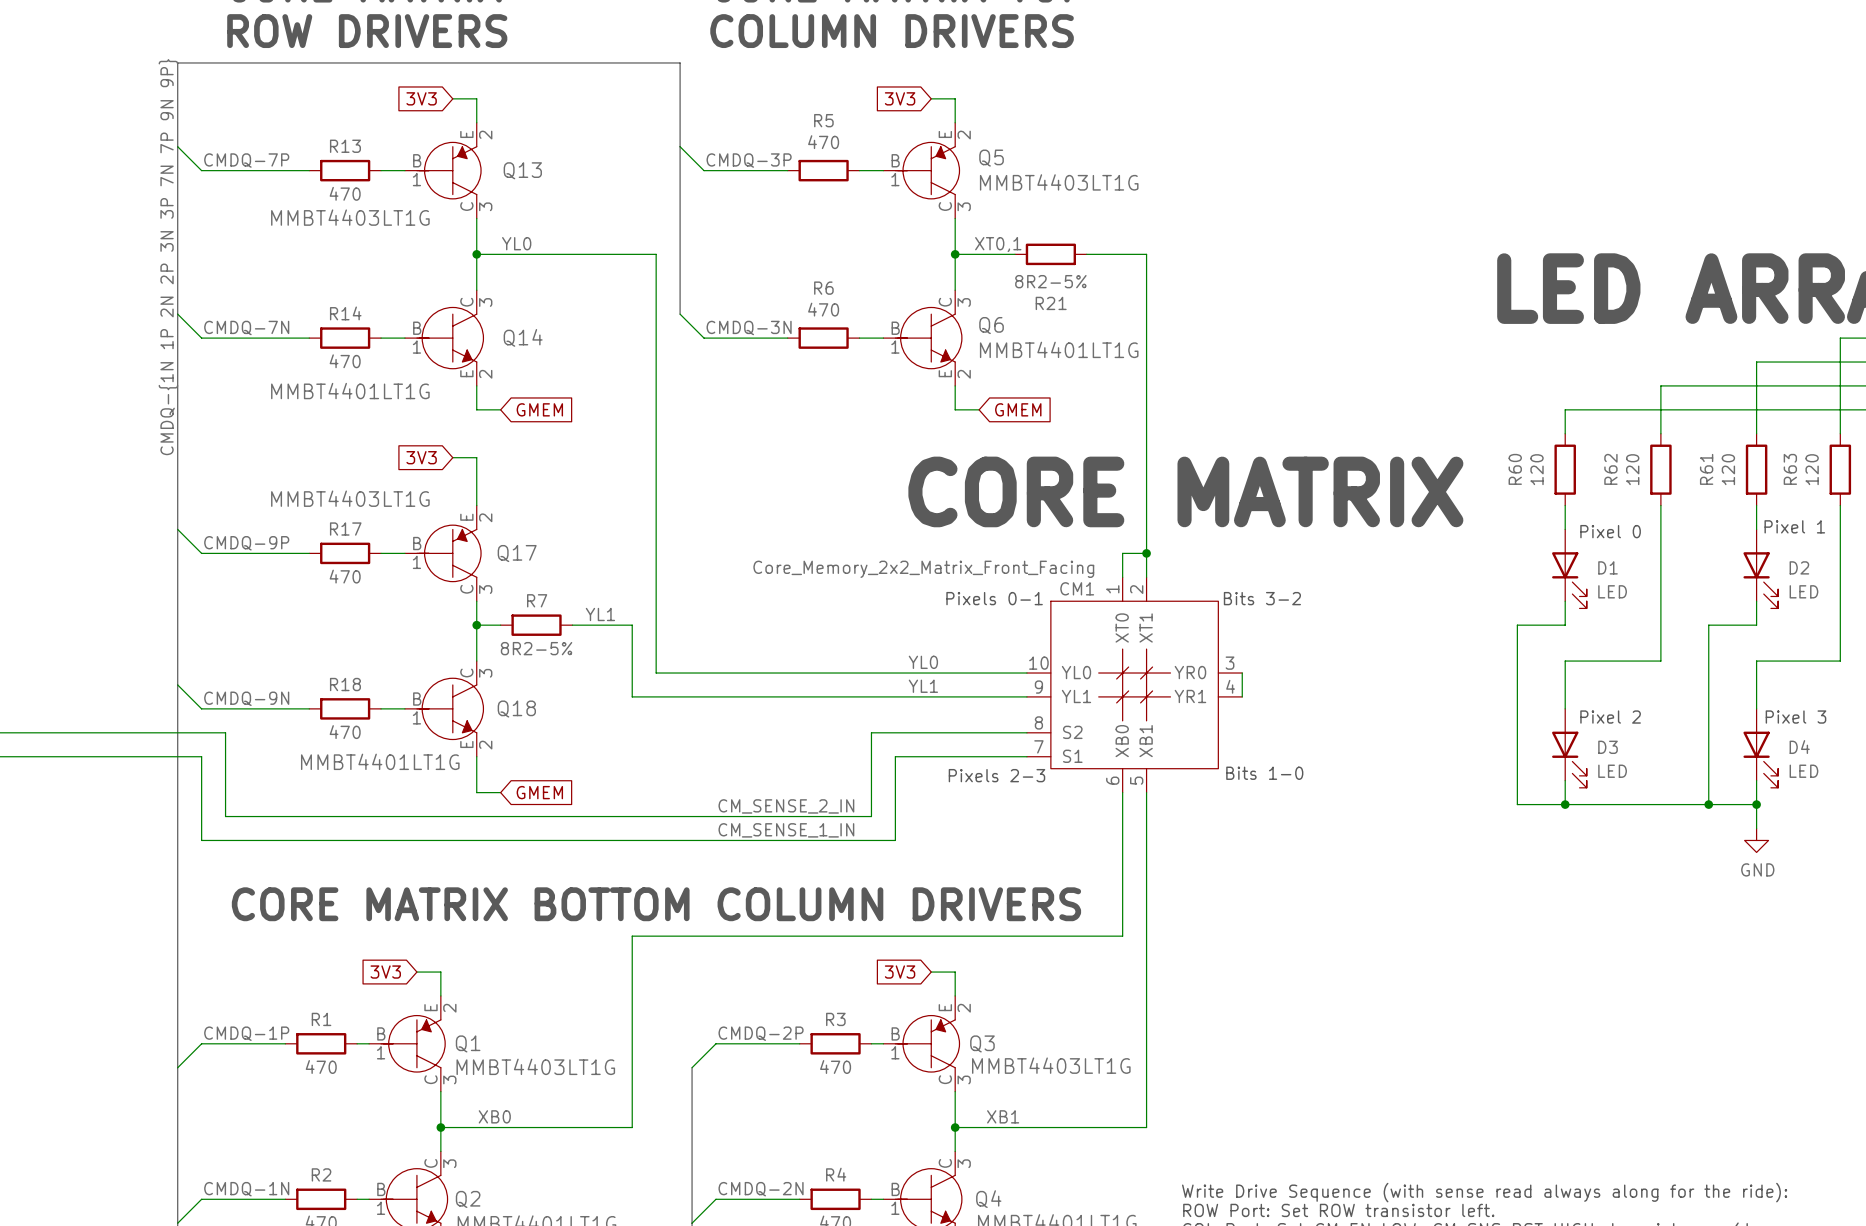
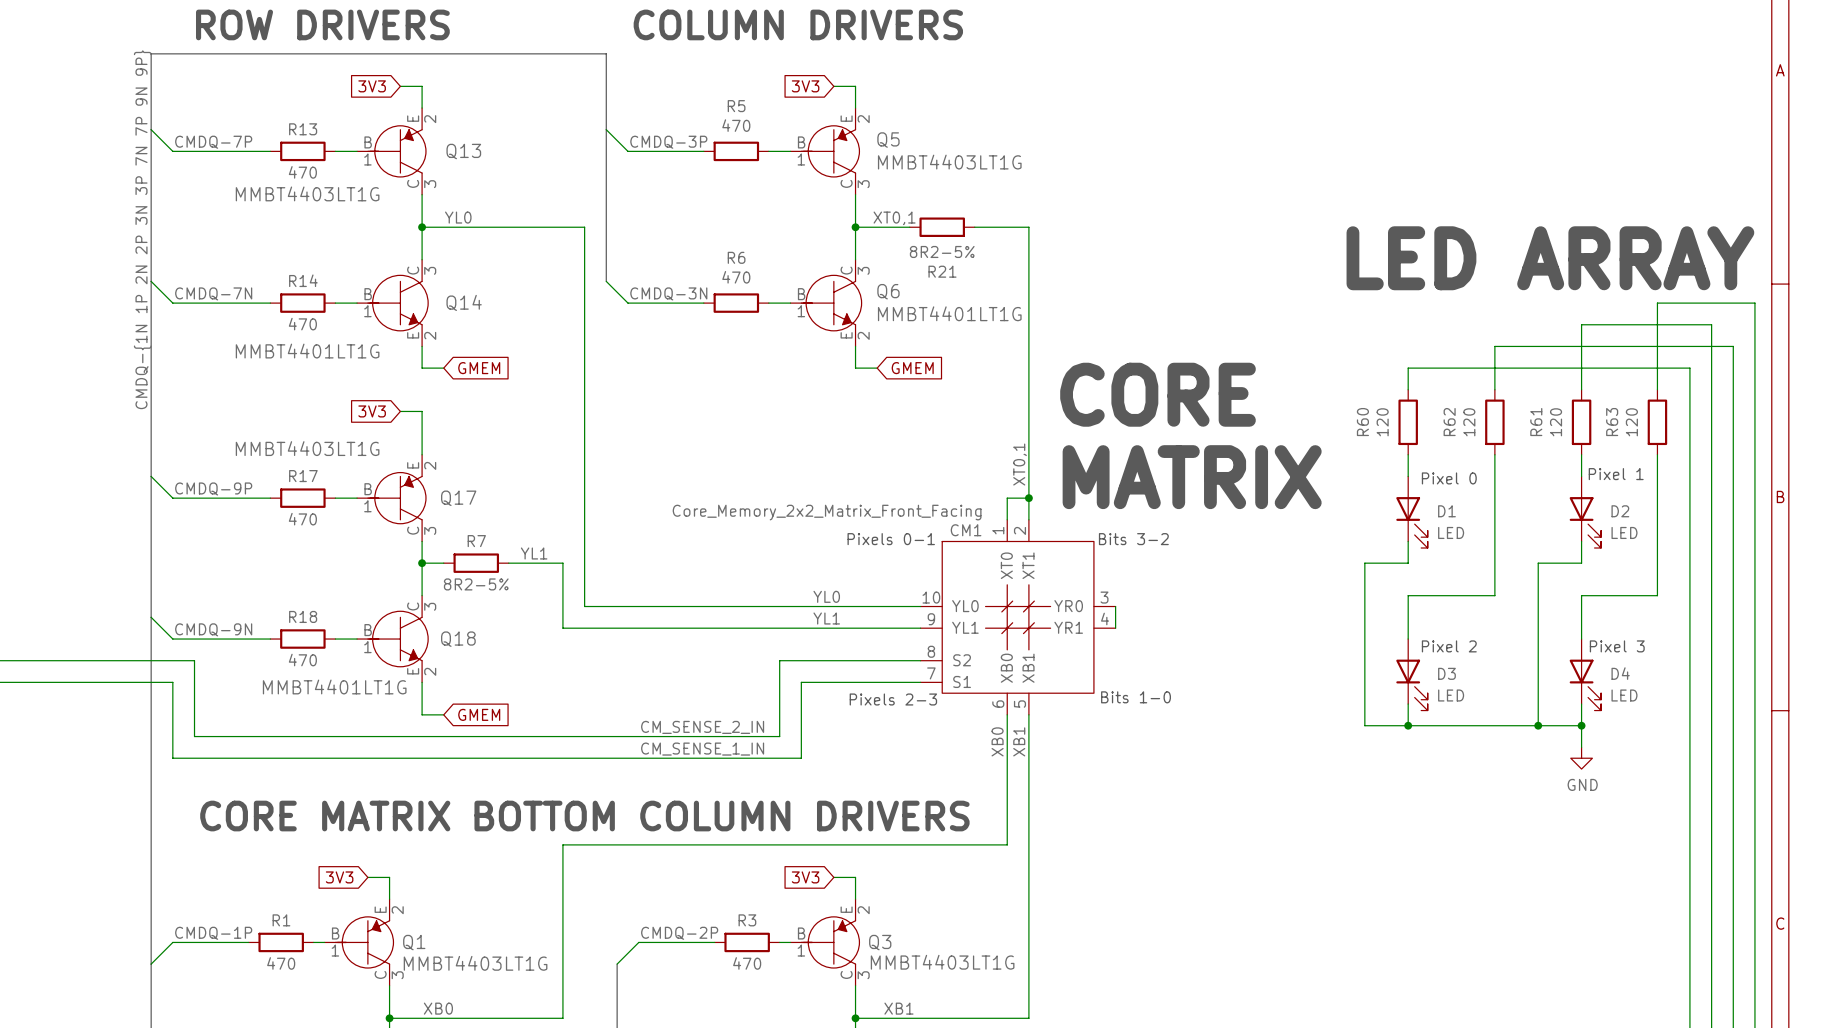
text: none -> CORE (1158, 394)
text: CORE MATRIX (1185, 491) -> none
label: none -> XT0,1 (1020, 464)
text: none -> MATRIX (1192, 477)
label: none -> XB0 (997, 741)
label: none -> XB1 (1019, 741)

